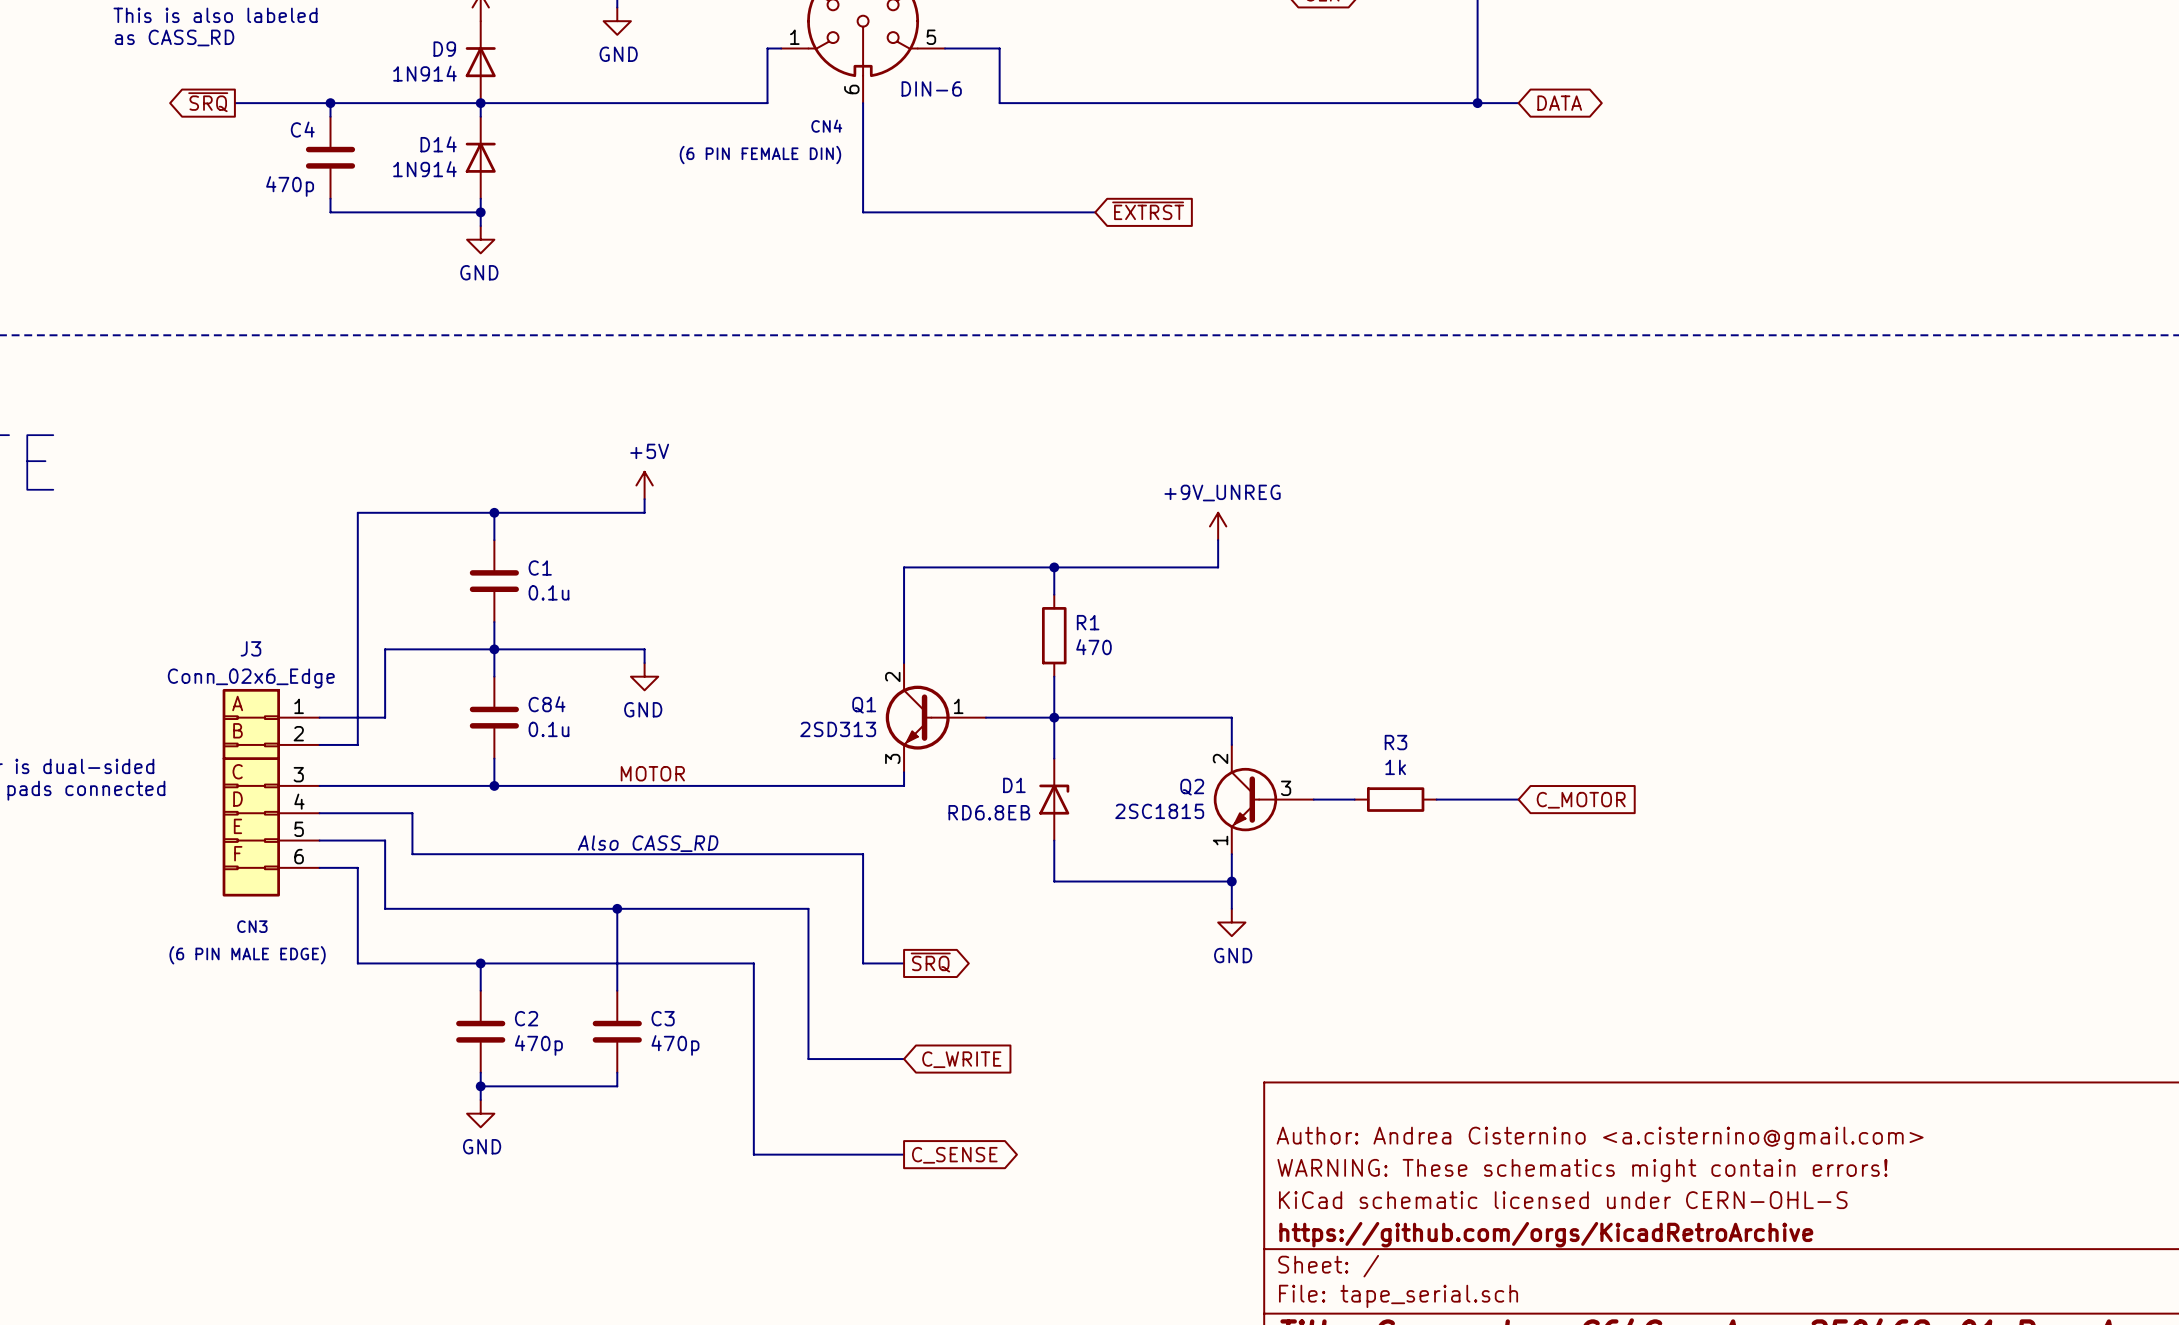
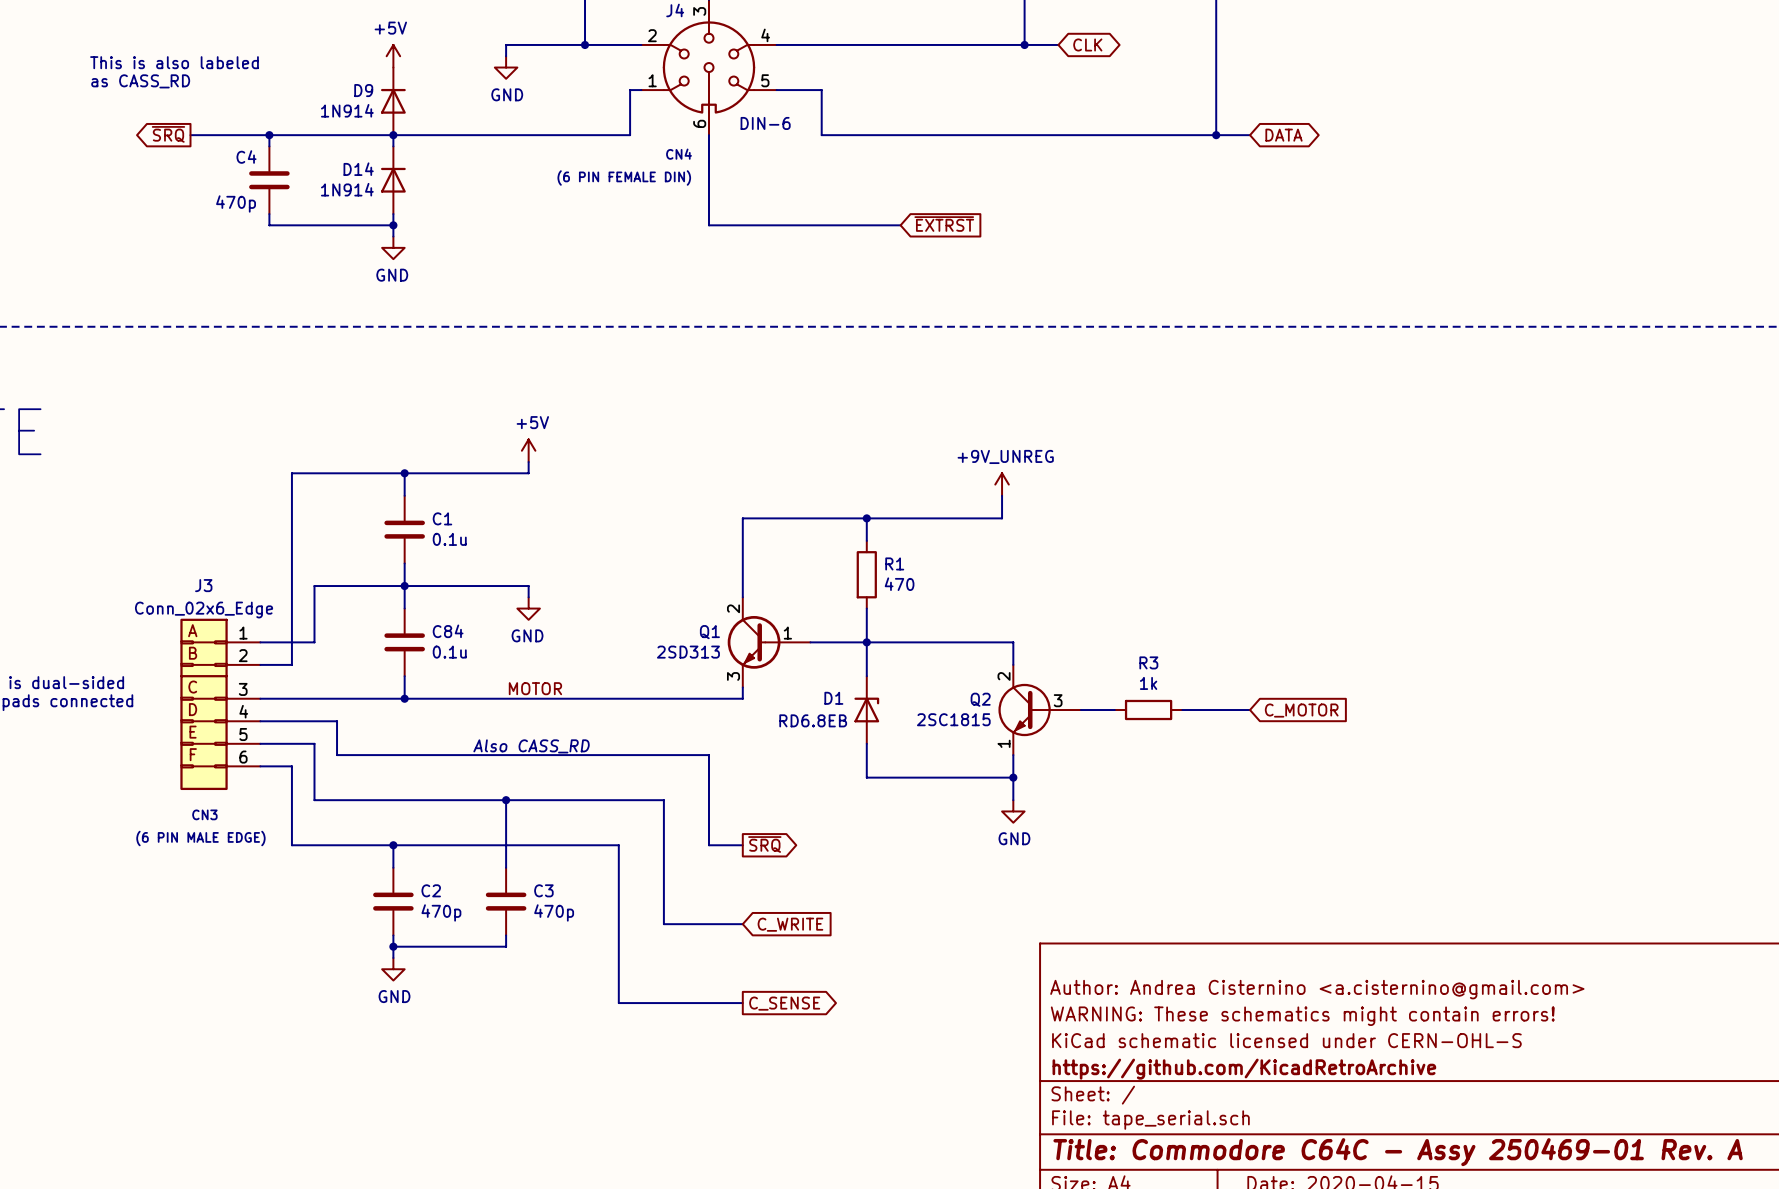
title block: https://github.com/orgs/KicadRetroArchive (1546, 1234) -> https://github.com/KicadRetroArchive (1244, 1069)

